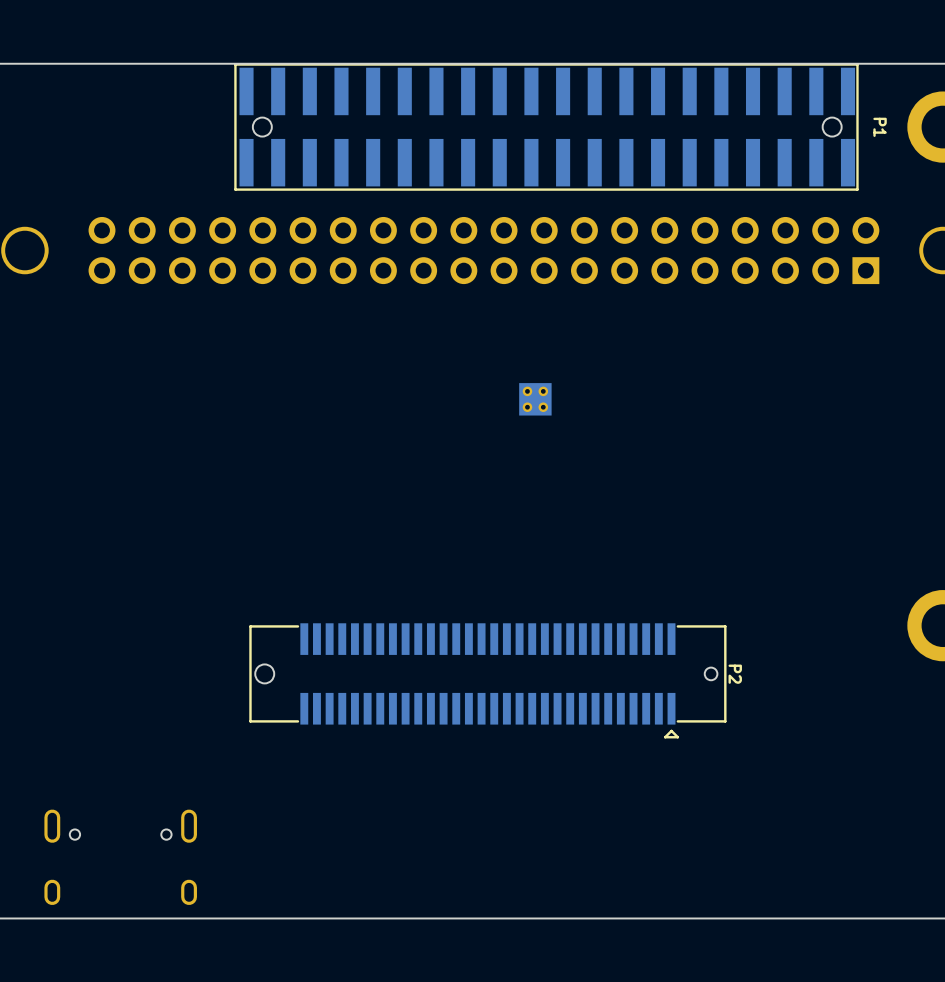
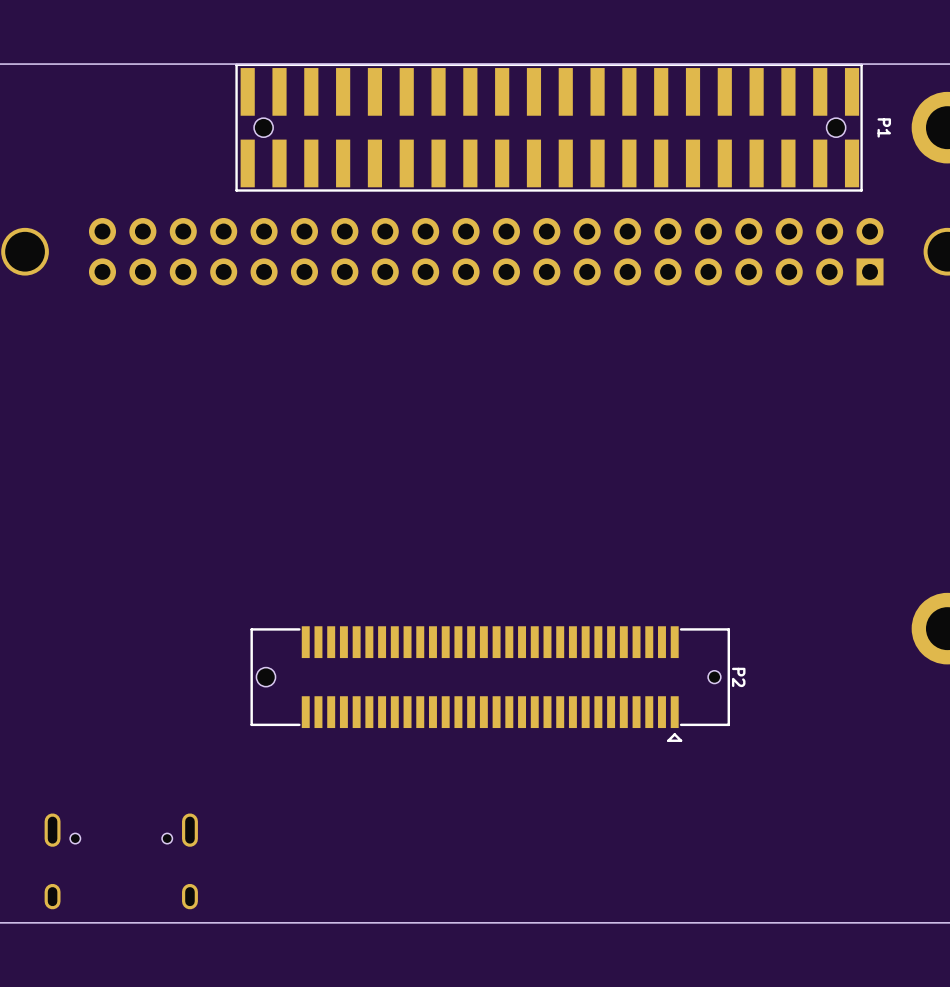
part: (535, 399) -> none

